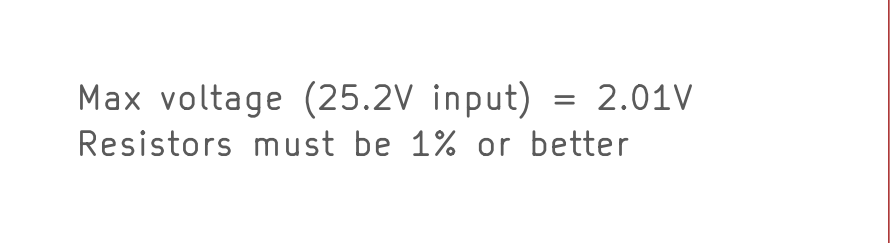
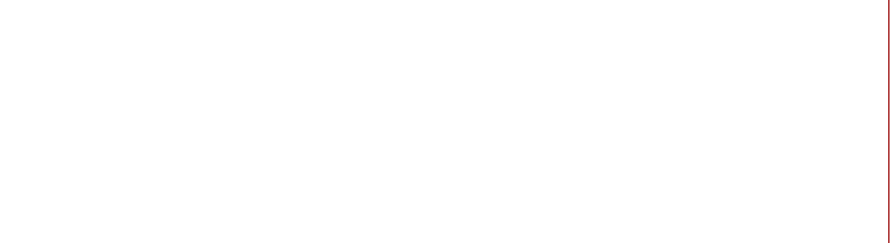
text: Max voltage (25.2V input) = 2.01V (386, 99) -> none
text: Resistors must be 1% or better (354, 143) -> none

